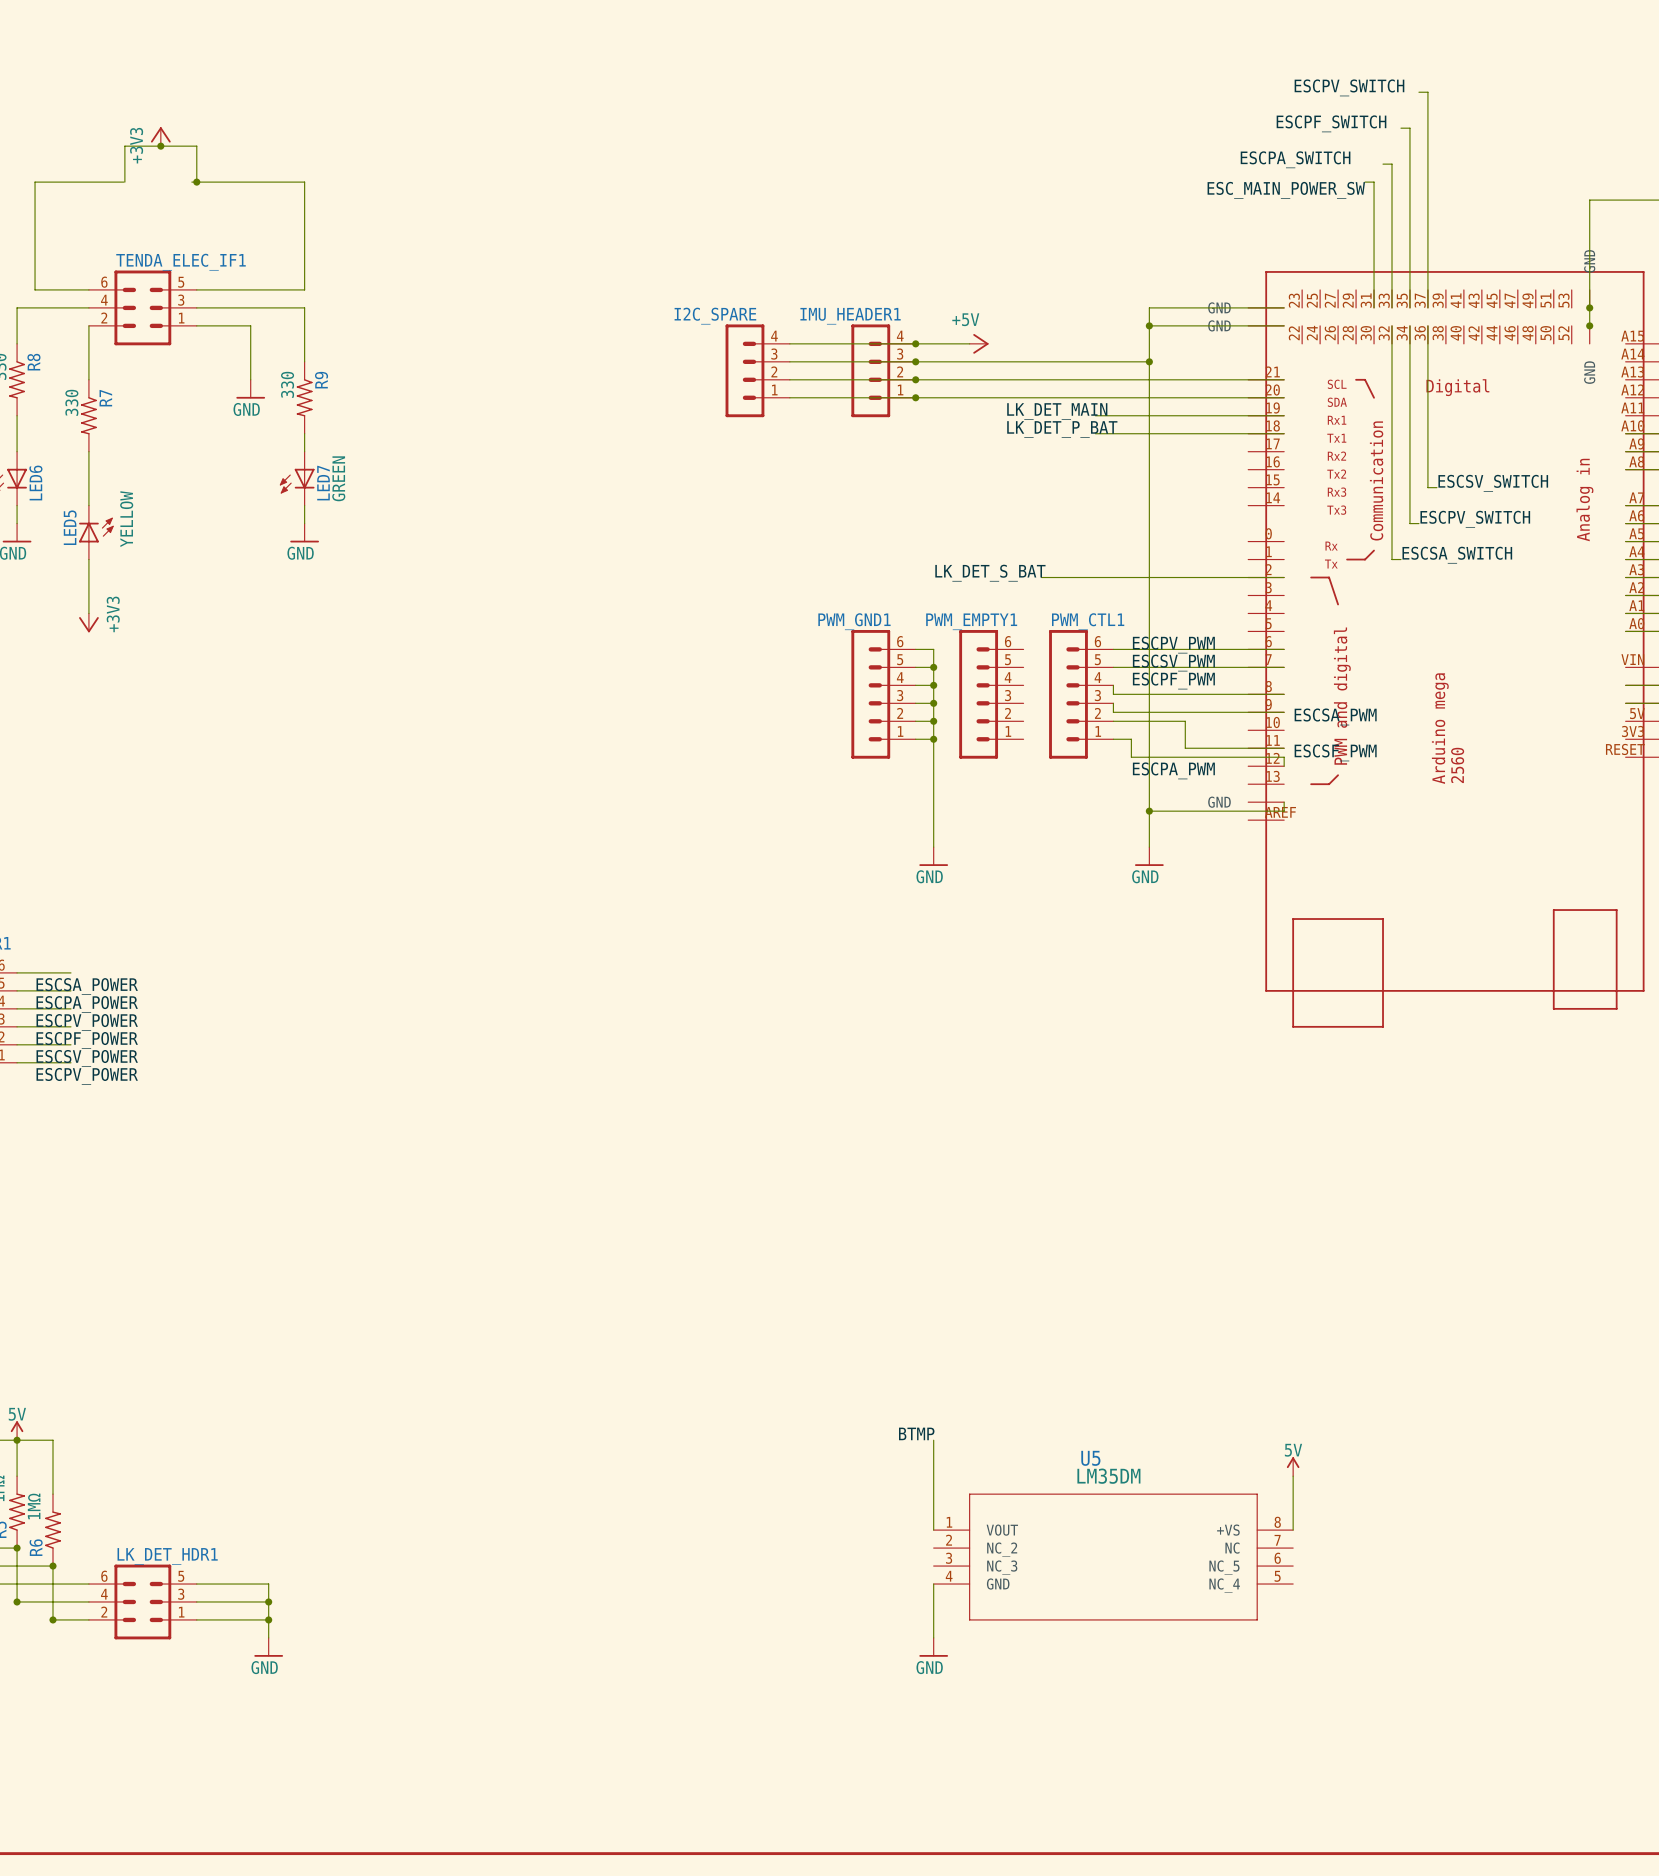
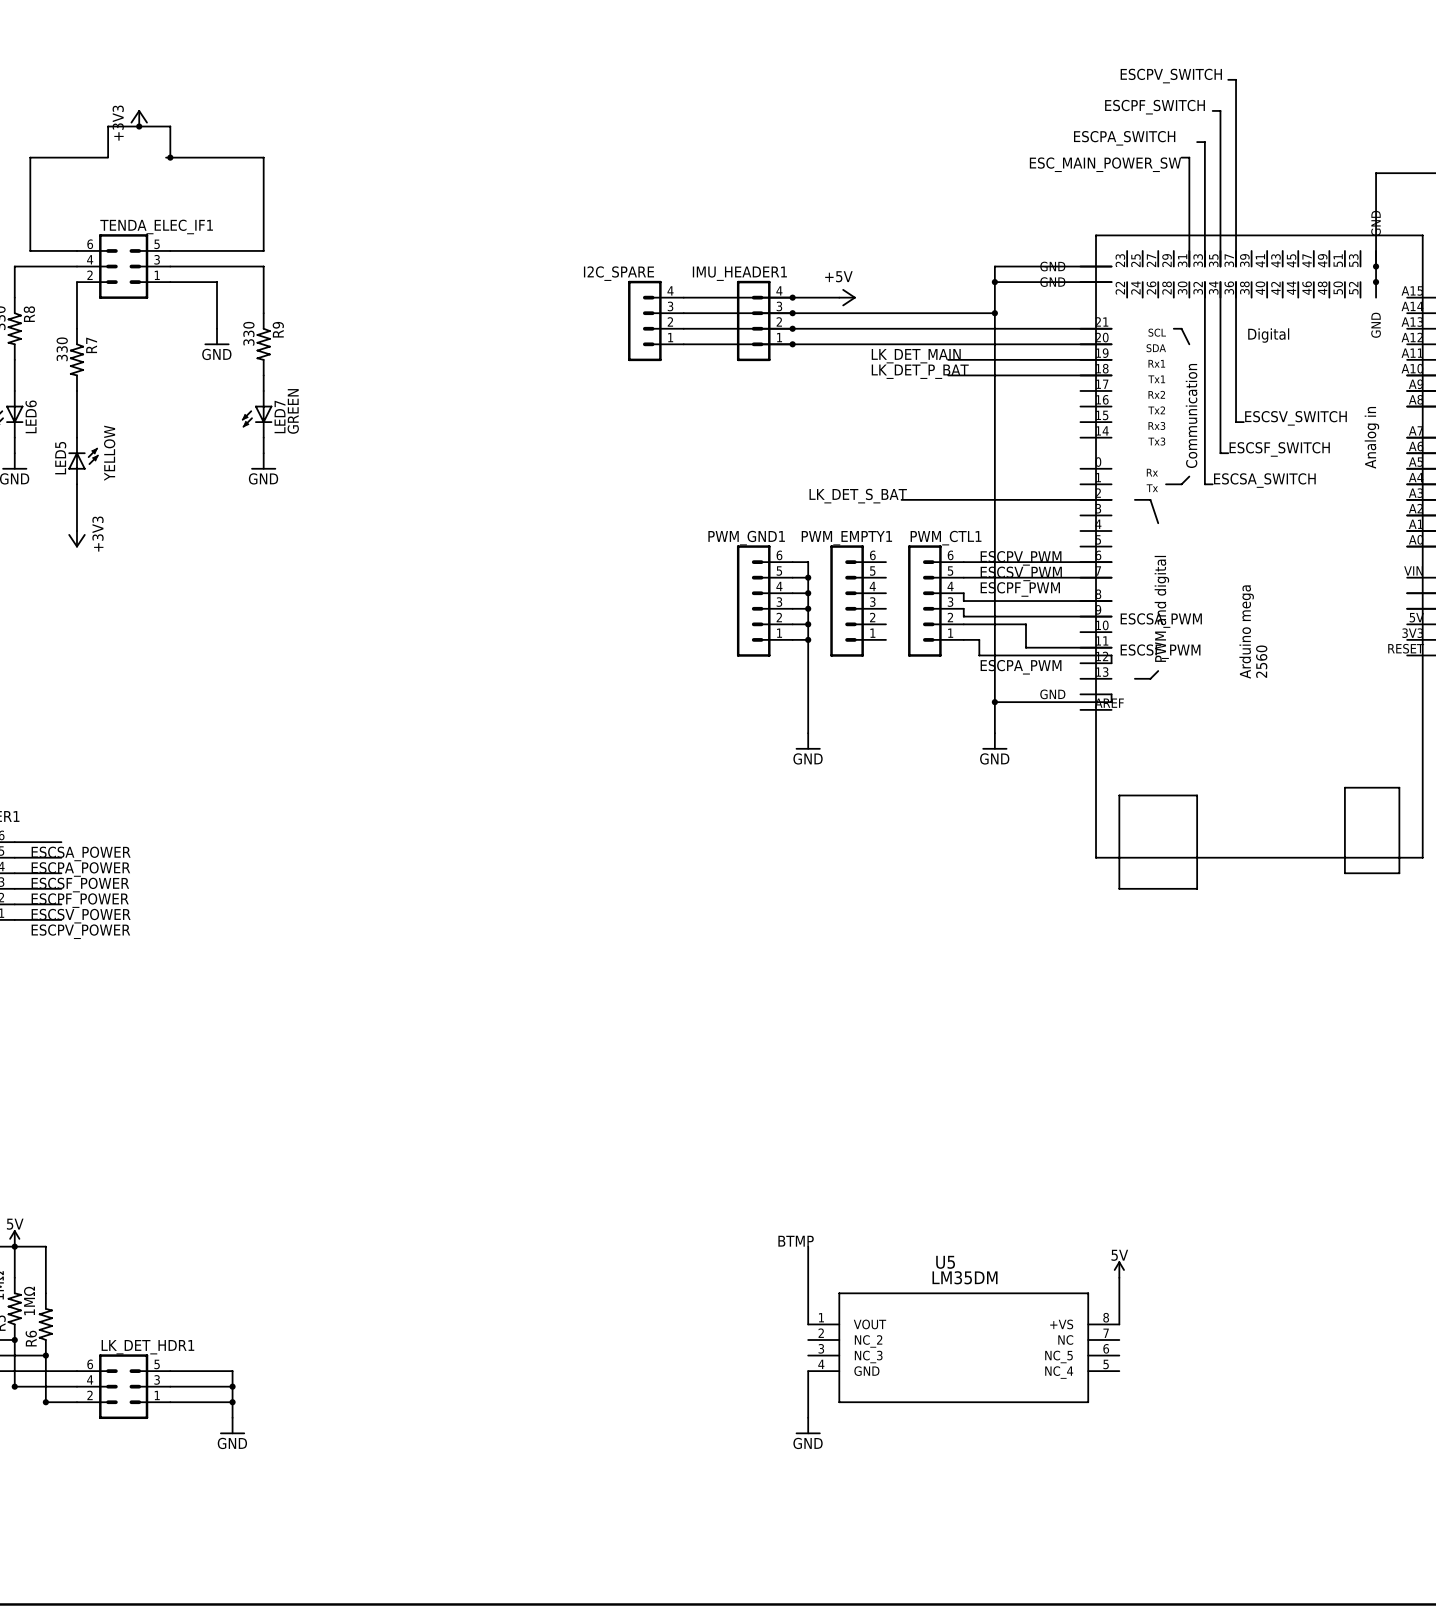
label: ESCPV_SWITCH (1475, 519) -> ESCSF_SWITCH (1279, 449)
label: ESCPV_POWER (87, 1022) -> ESCSF_POWER (80, 885)

